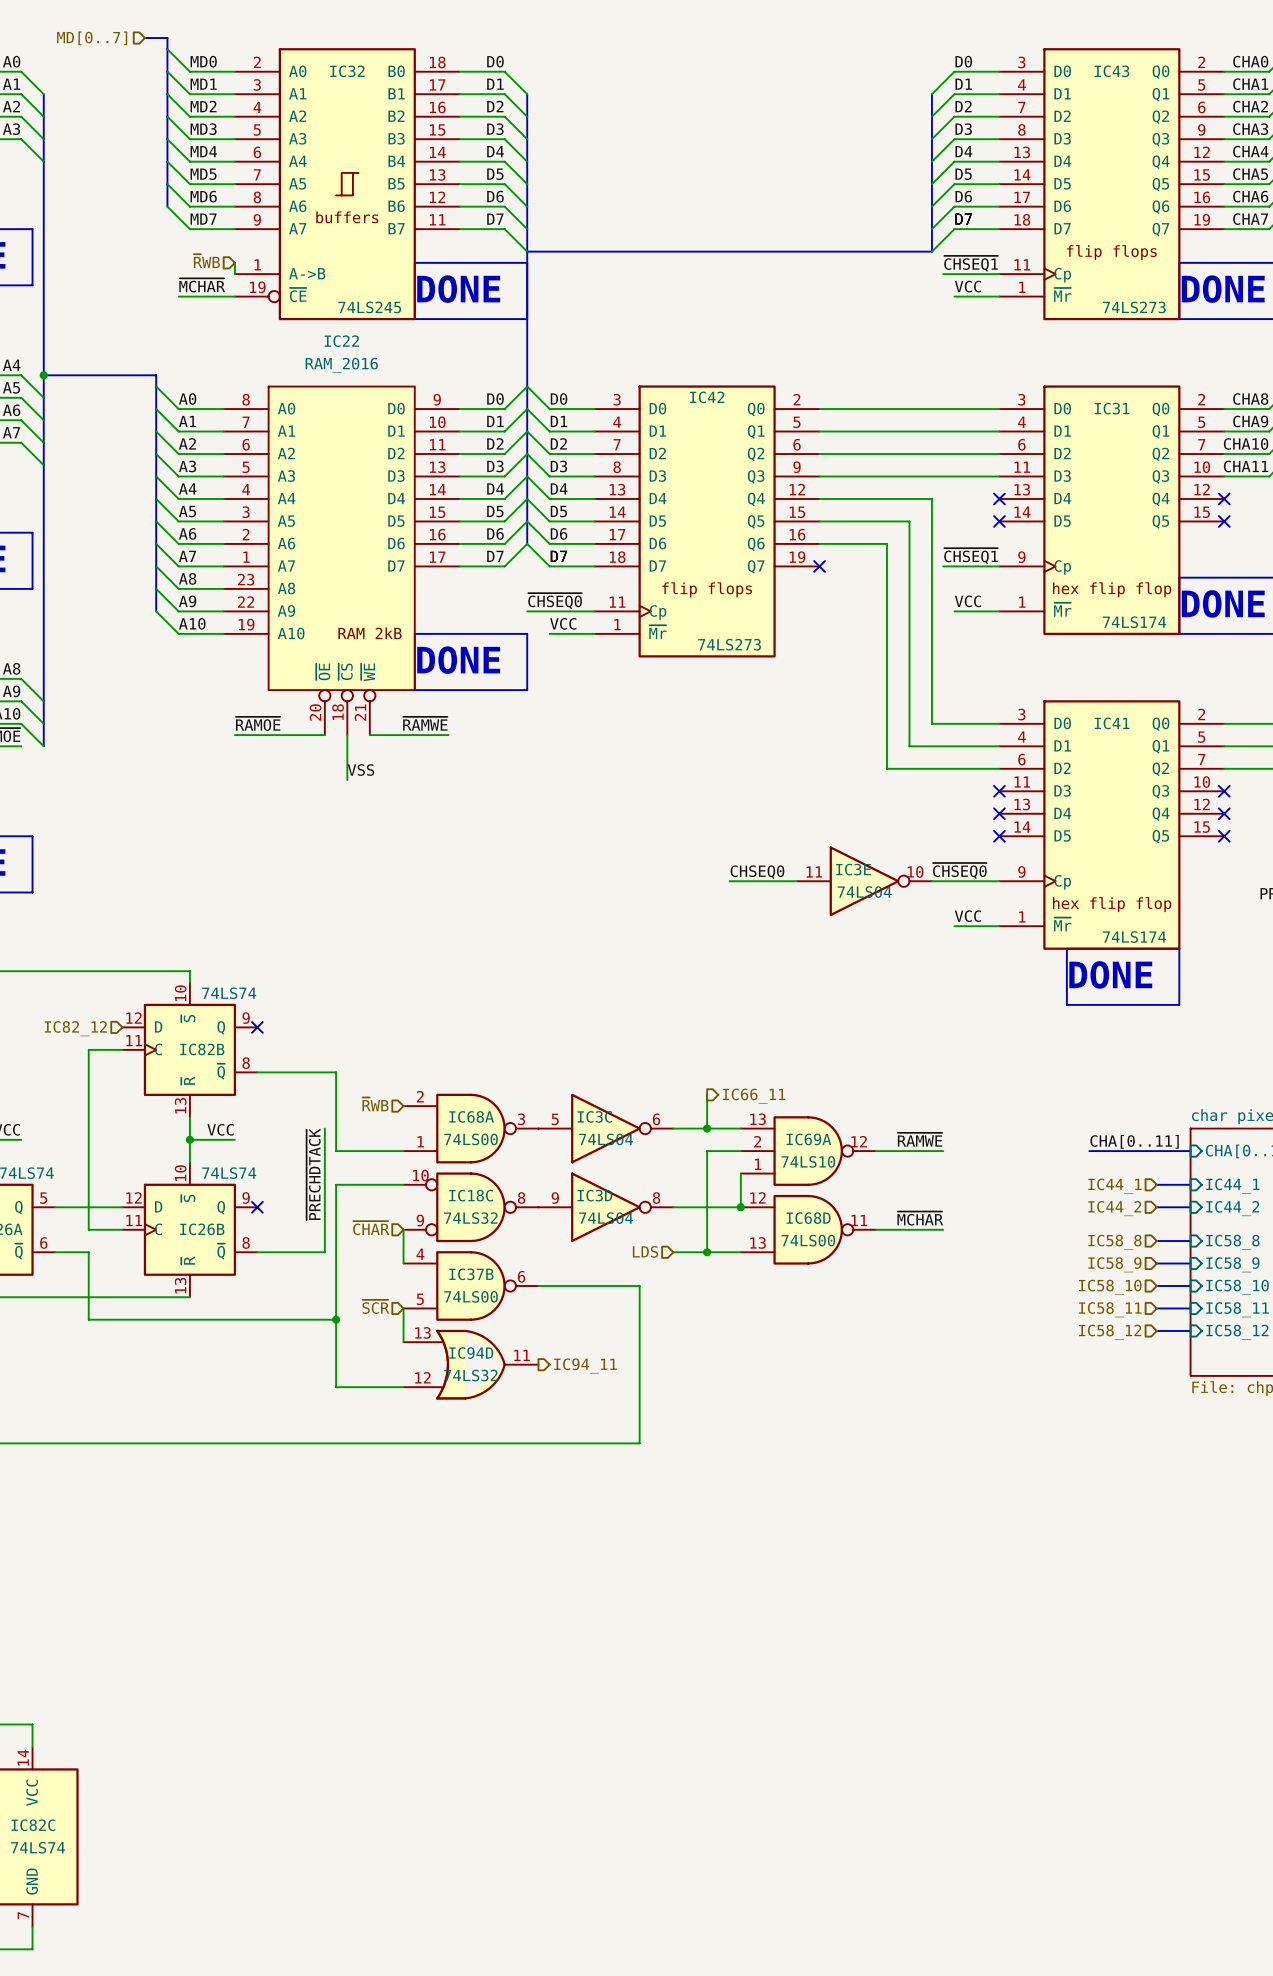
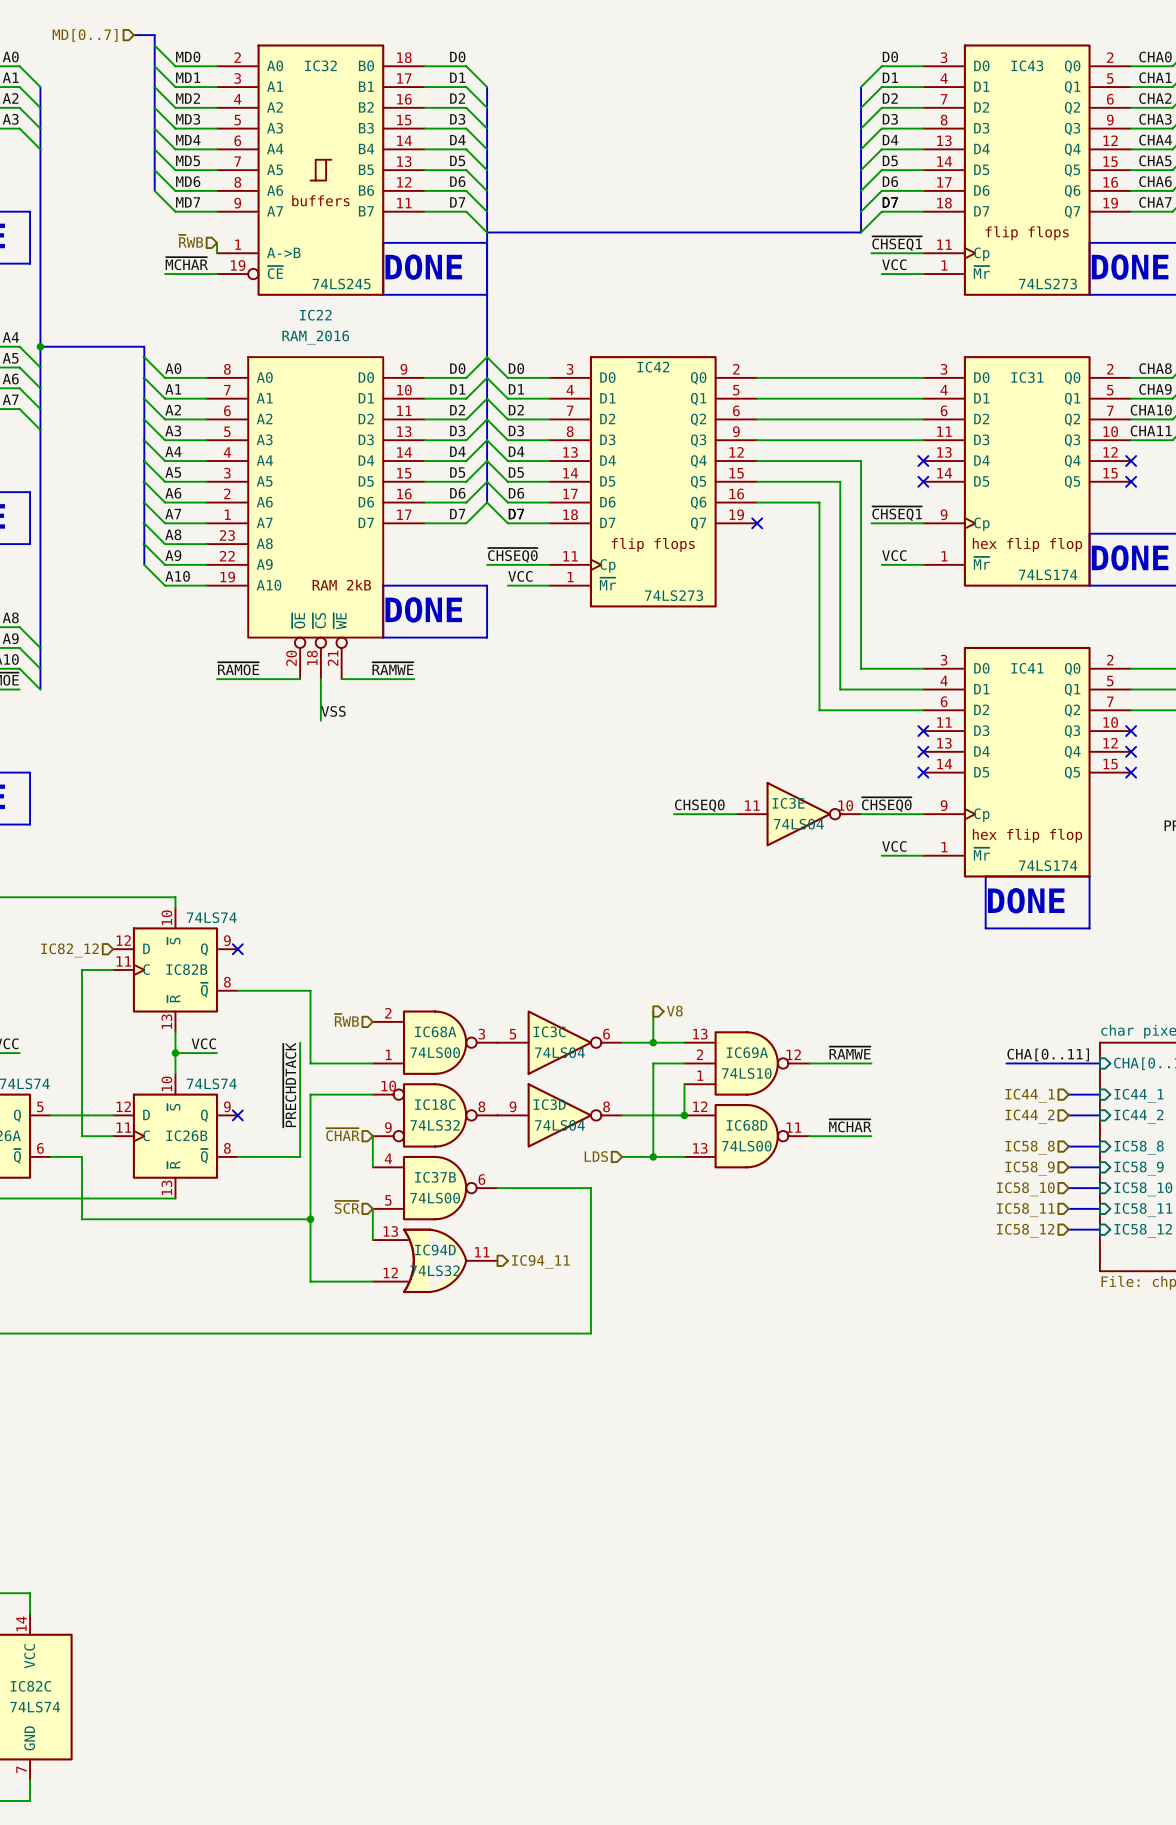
hierarchical label: IC66_11 (754, 1096) -> V8 (674, 1011)

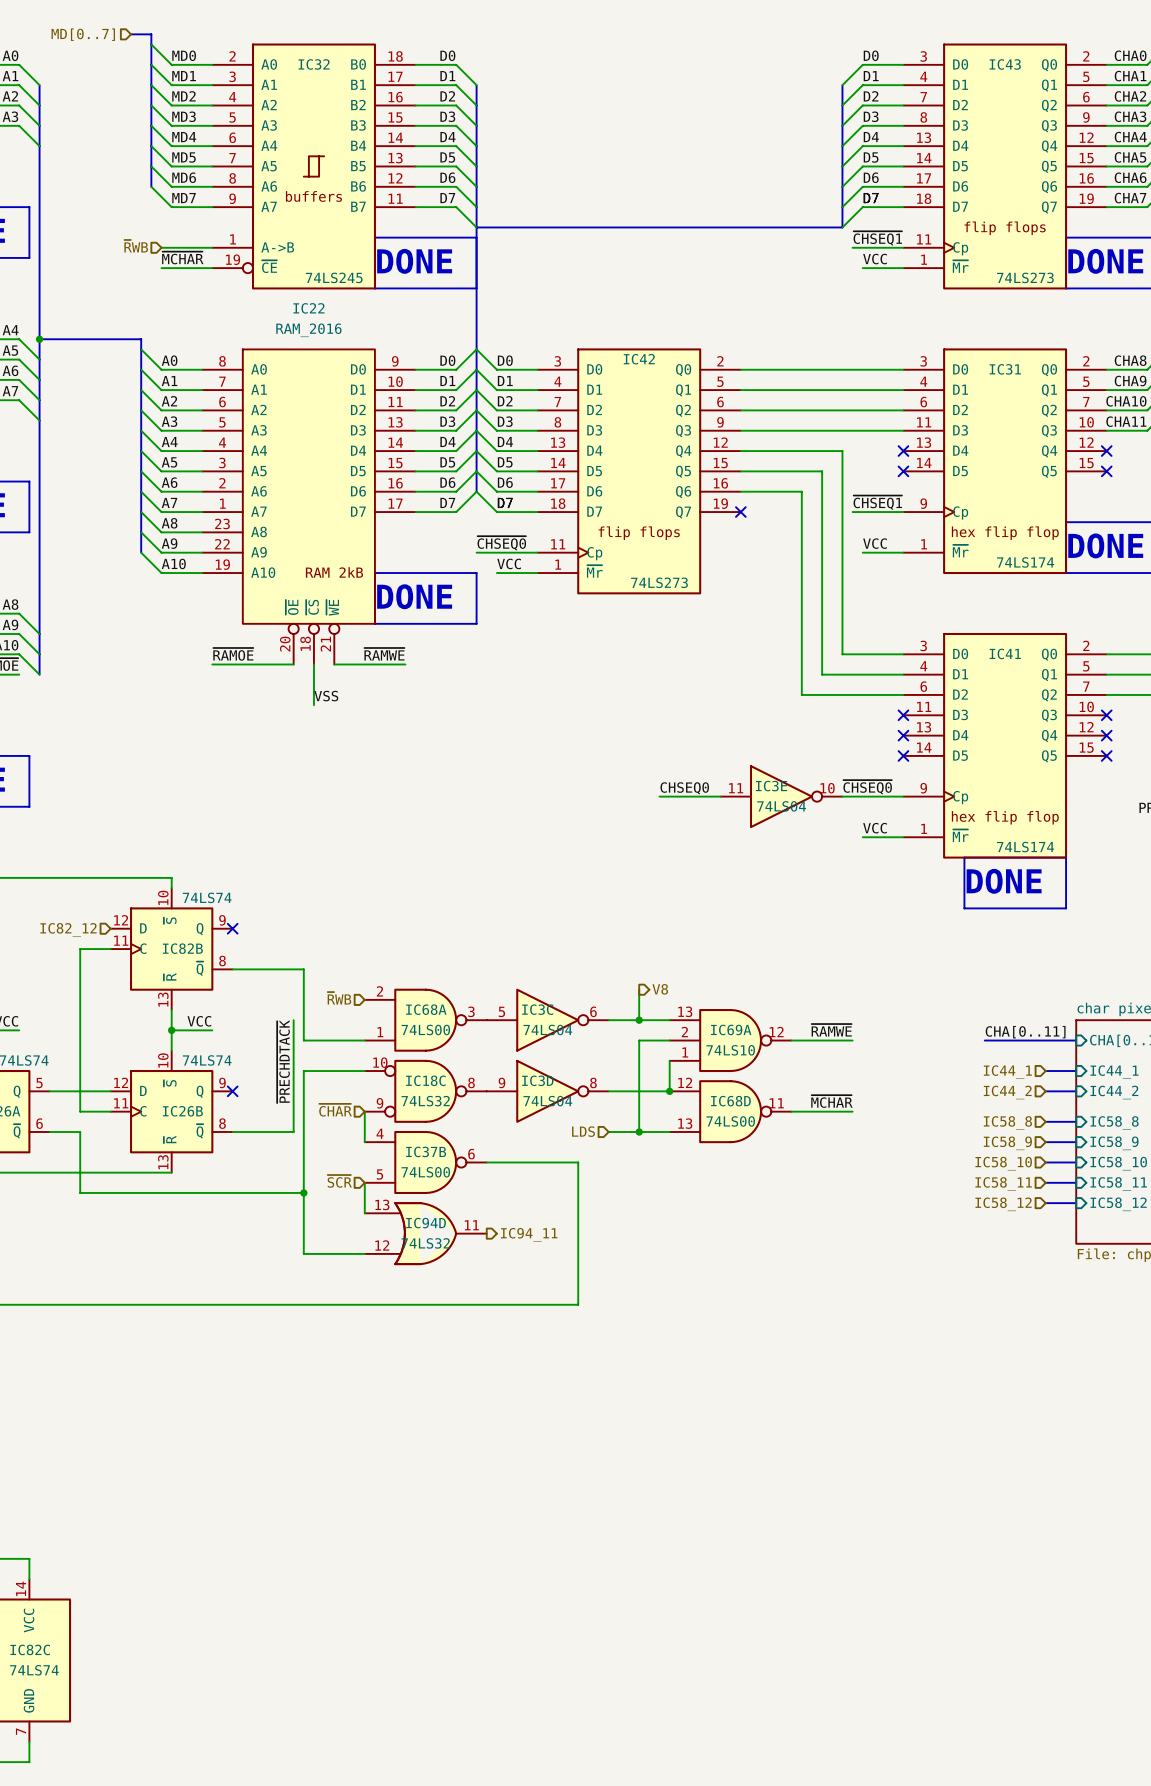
hierarchical label position: ~{R}WB (191, 241) -> ~{R}WB (136, 246)
wire: (217, 242) (217, 253) -> (161, 247) (212, 247)

